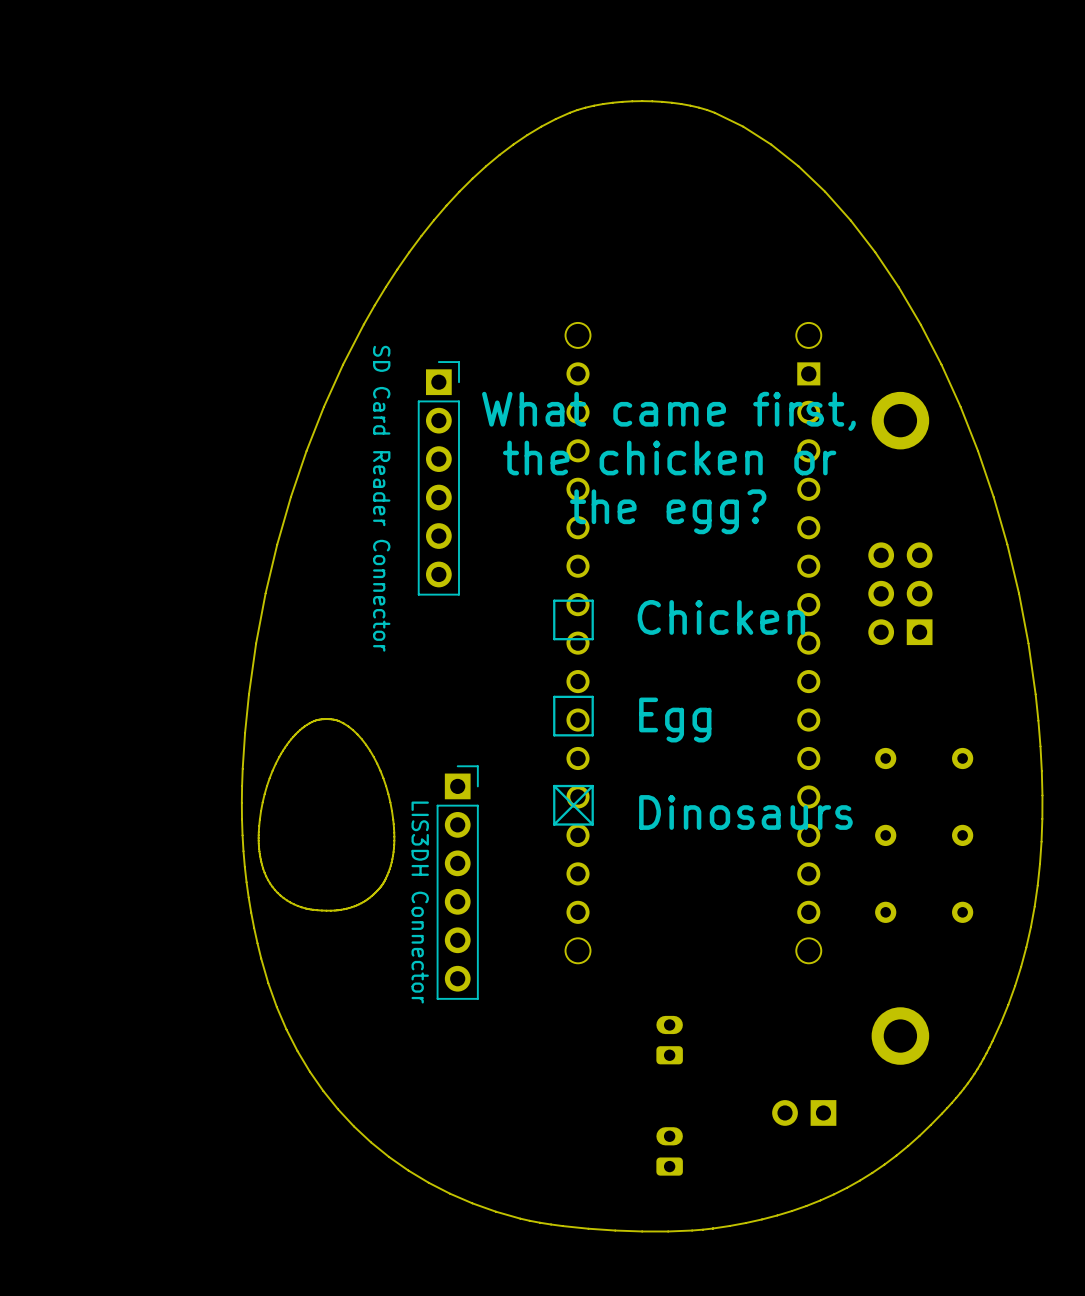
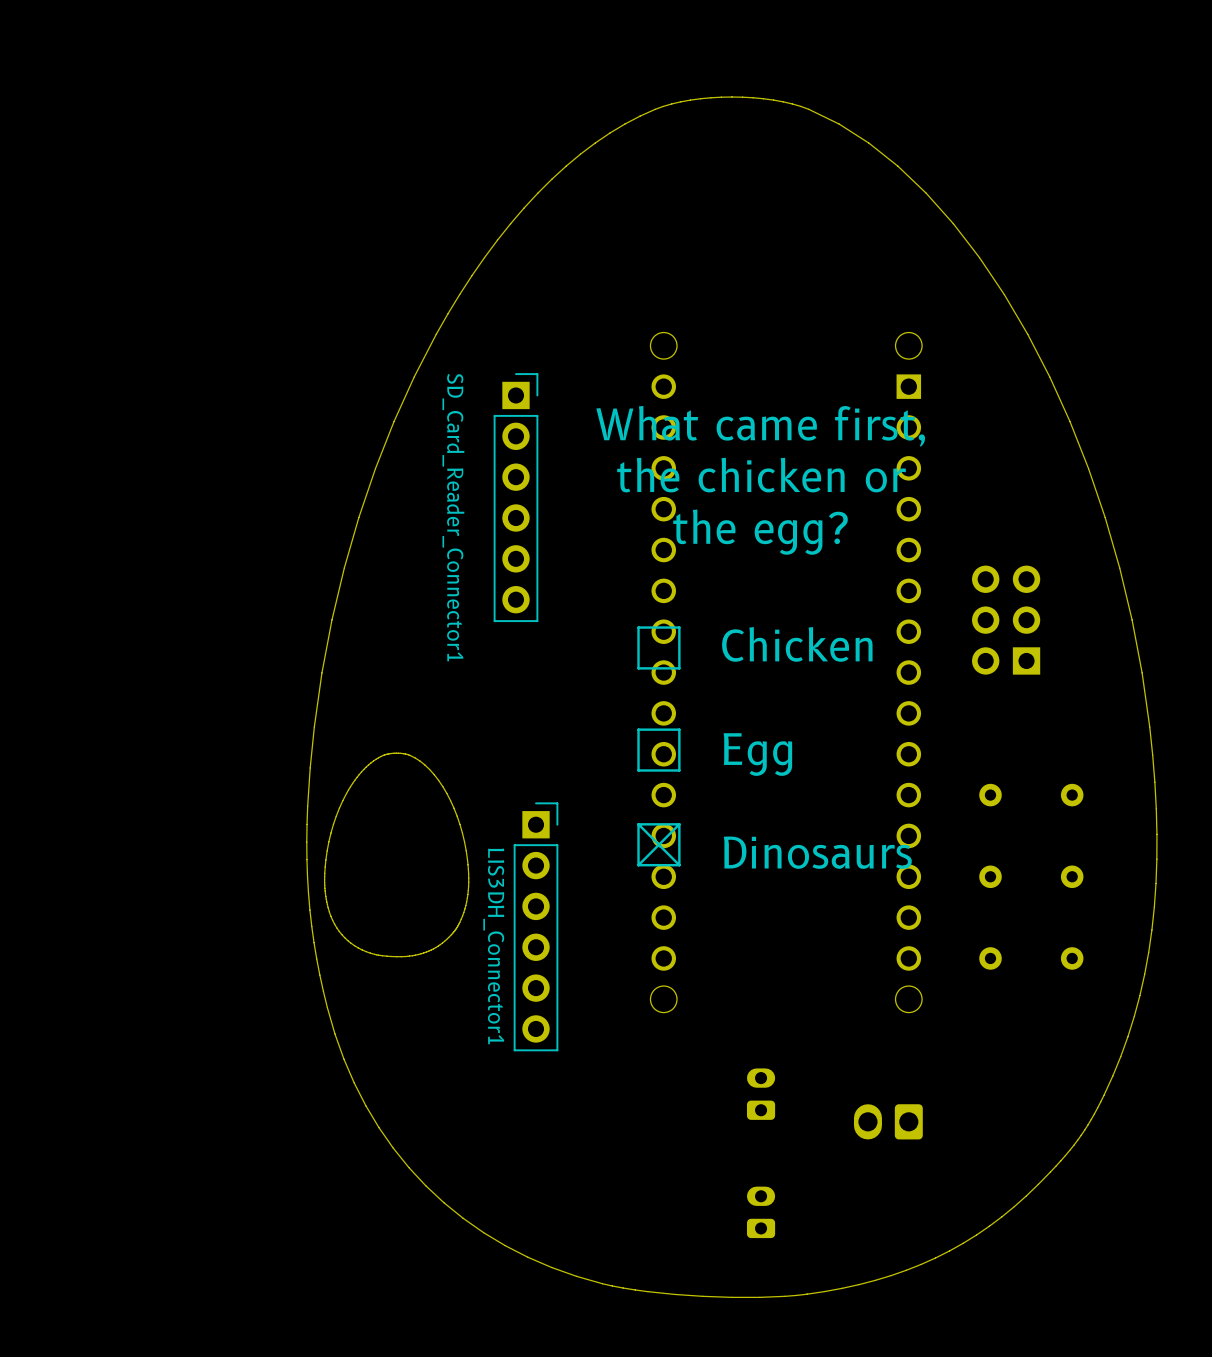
part: (900, 420) -> none
SD Card Reader Connector name: SD Card Reader Connector (381, 498) -> SD_Card_Reader_Connector1 (453, 517)
LIS3DH Connector name: LIS3DH Connector (420, 902) -> LIS3DH_Connector1 (493, 946)
part: (900, 1036) -> none
part: none -> (888, 1121)
part: (804, 1112) -> none

